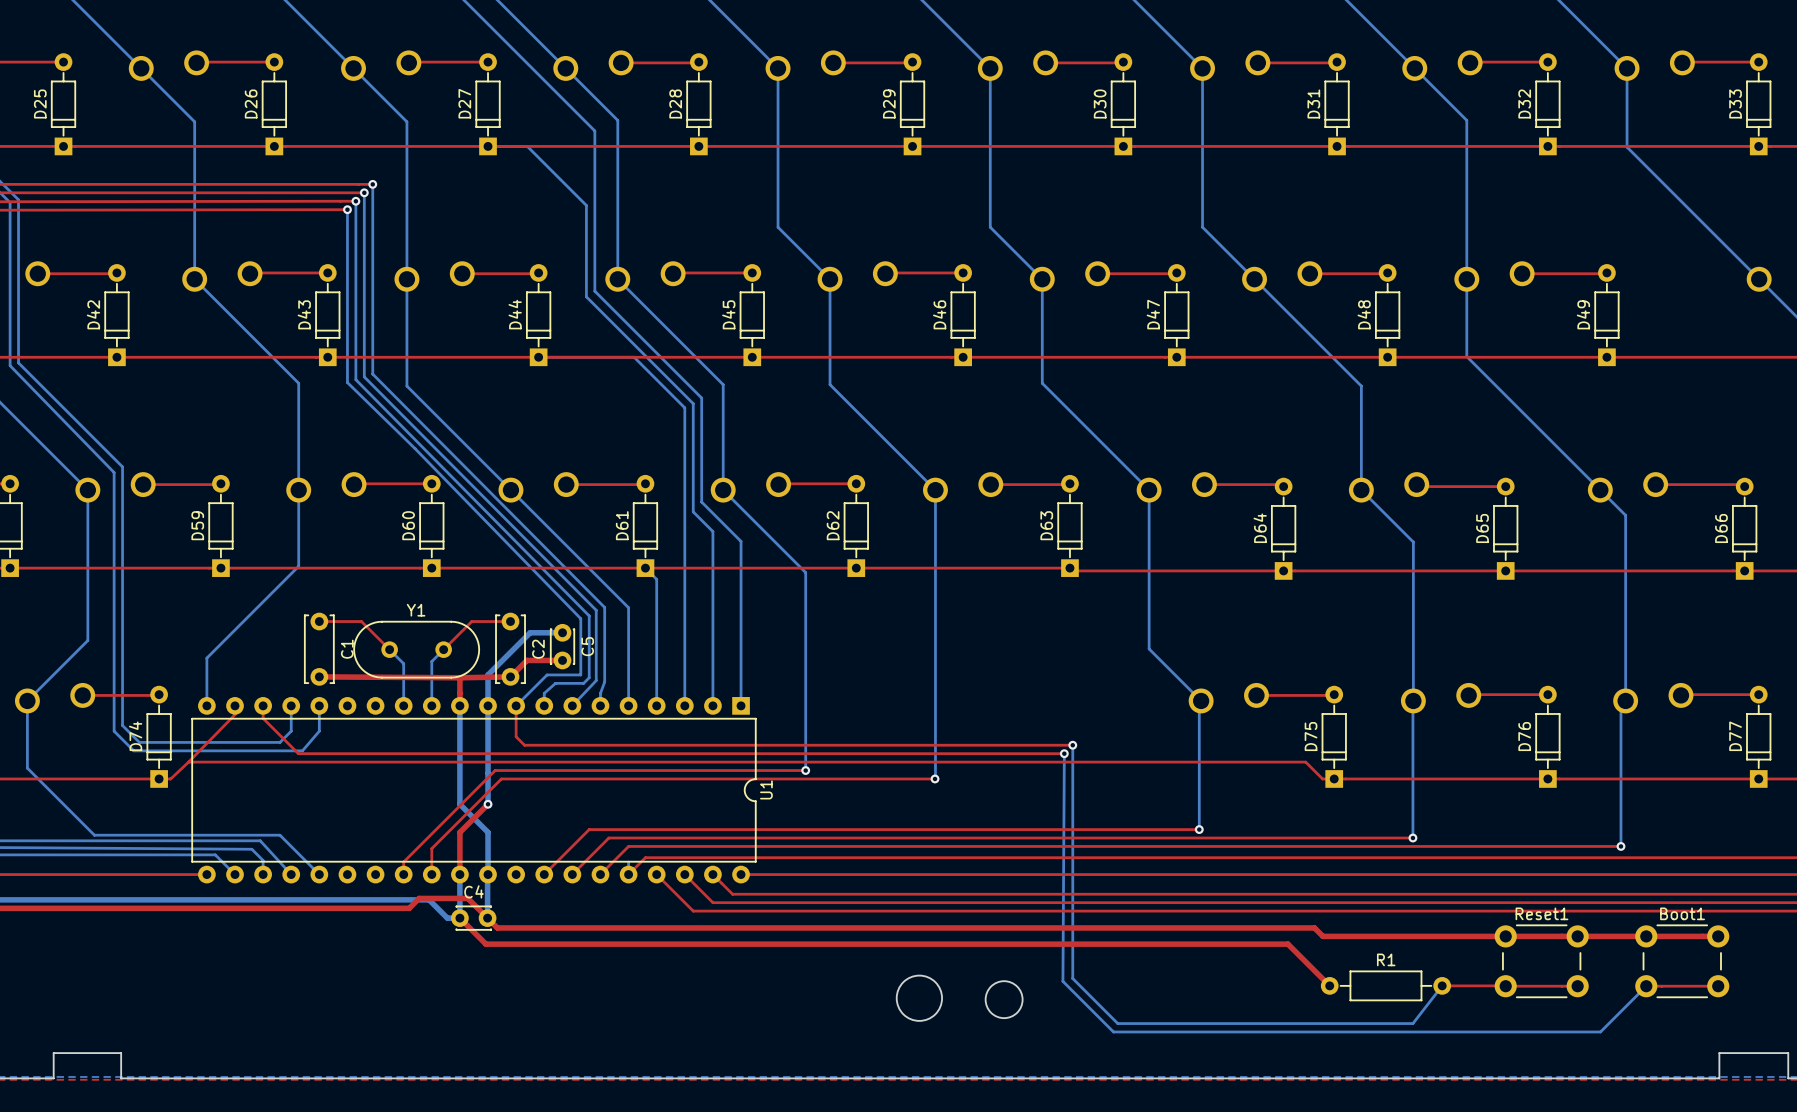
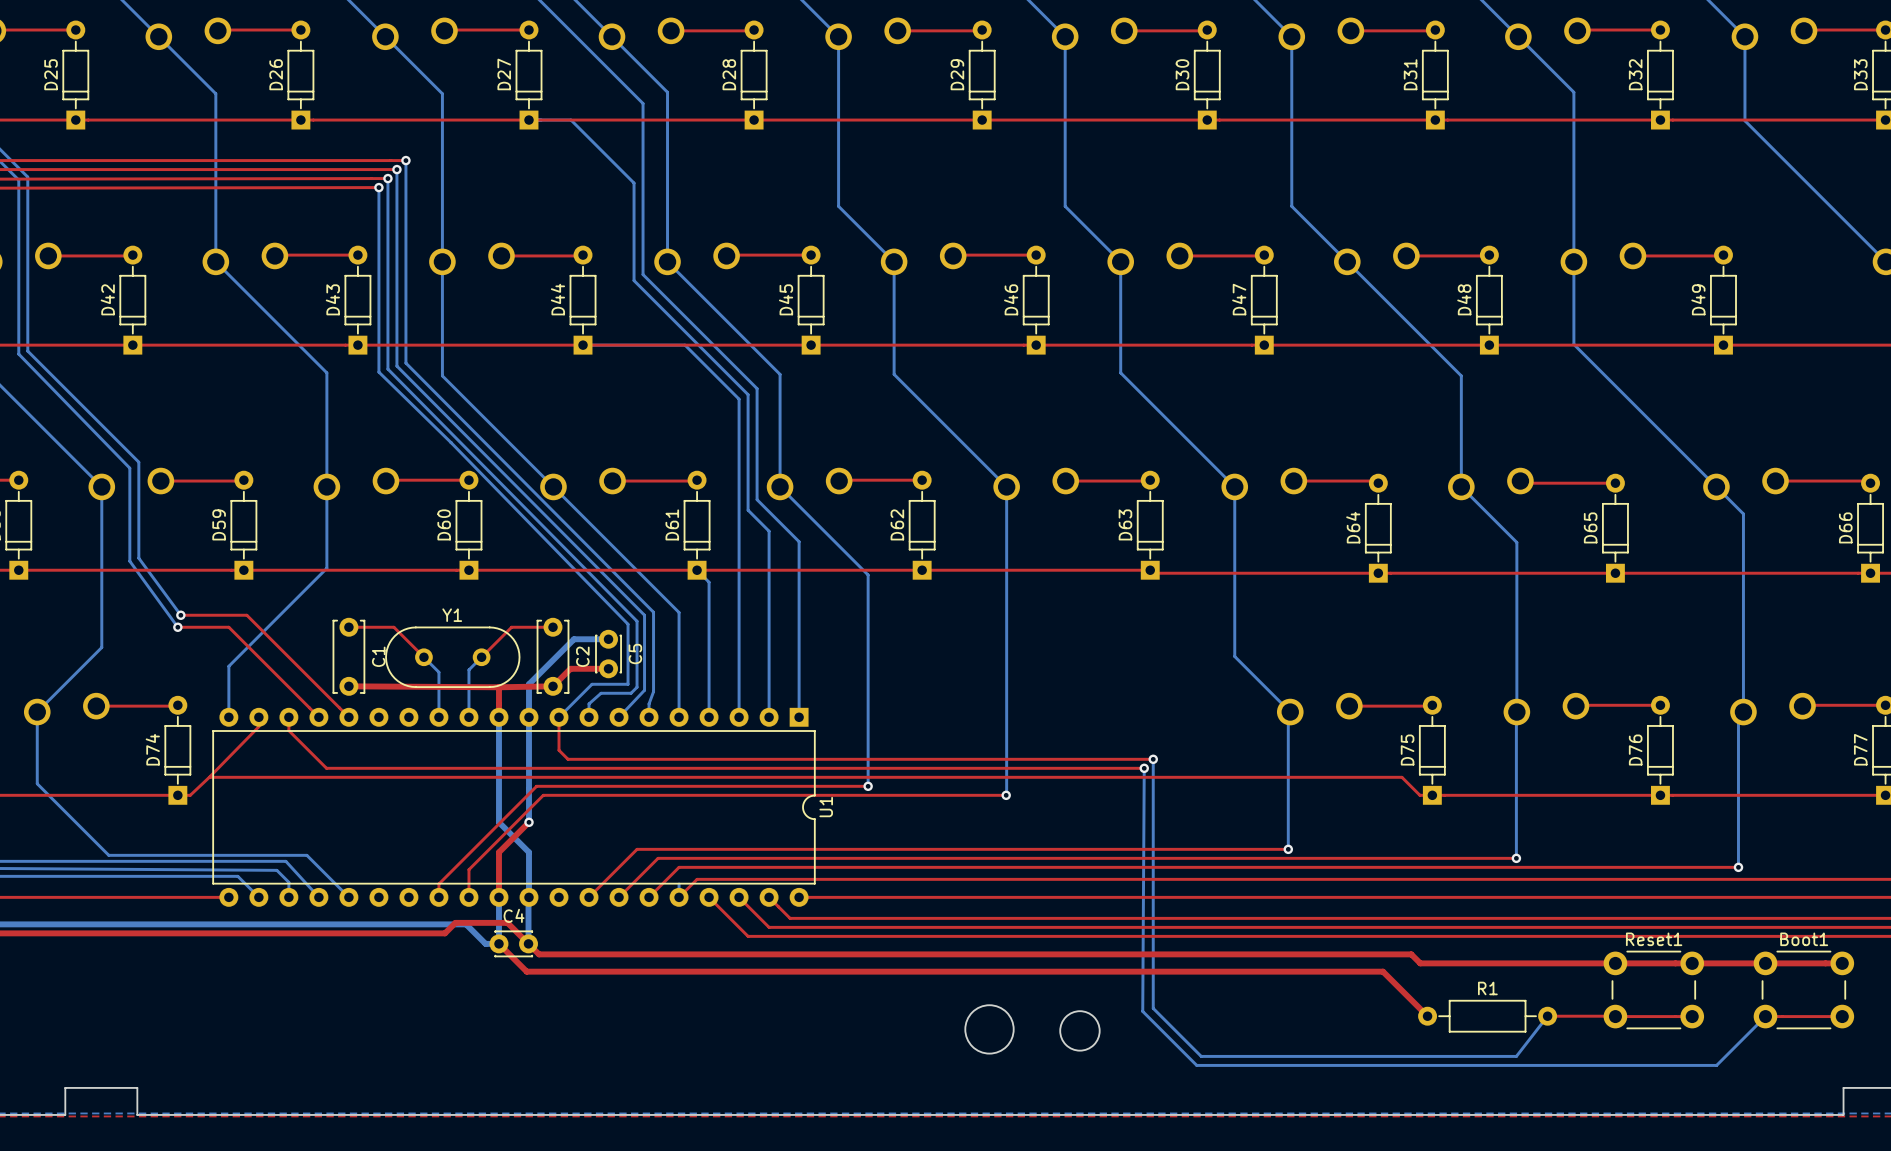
bottom track: (122, 556) (122, 725) (139, 742) (279, 742) (291, 731) (291, 705) -> (138, 558) (180, 615)
bottom track: (114, 559) (114, 731) (133, 750) (302, 750) (319, 731) (319, 705) -> (129, 561) (177, 627)
top track: none -> (180, 615) (246, 615) (348, 717)
via: none -> (180, 615)
top track: none -> (177, 627) (228, 627) (318, 717)
via: none -> (177, 627)

